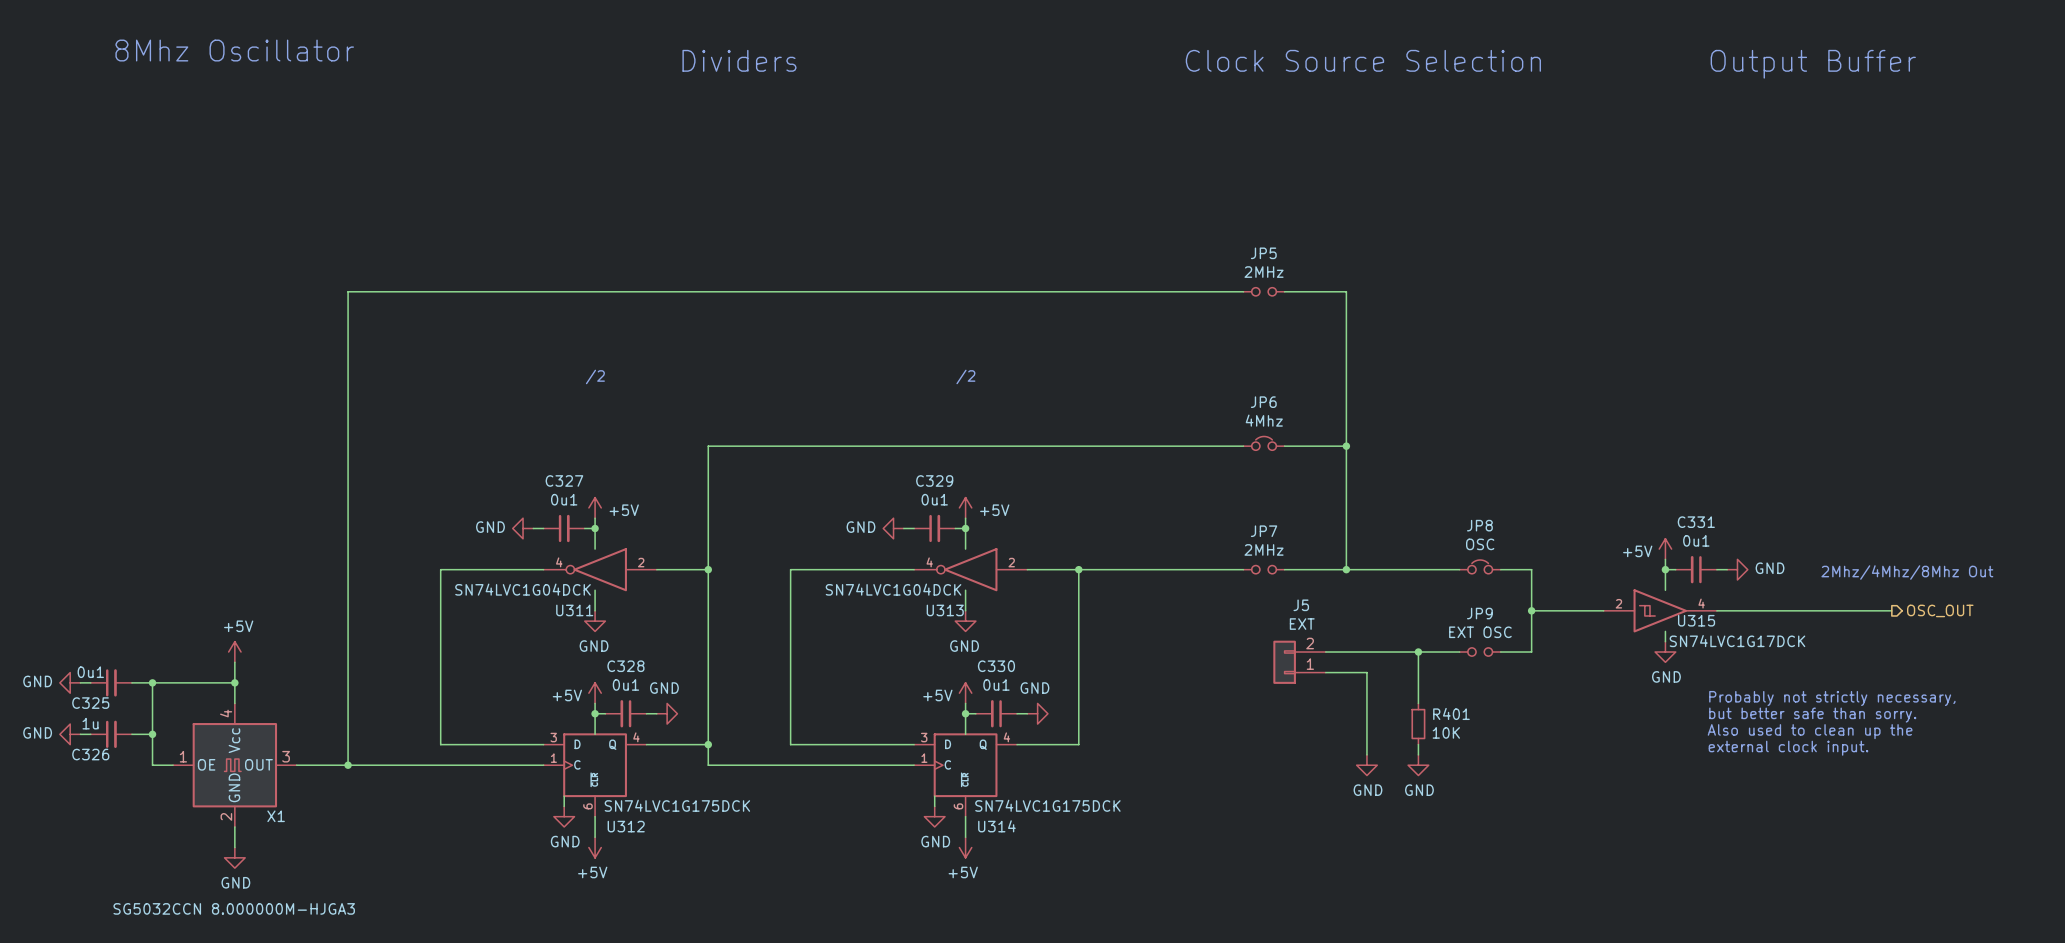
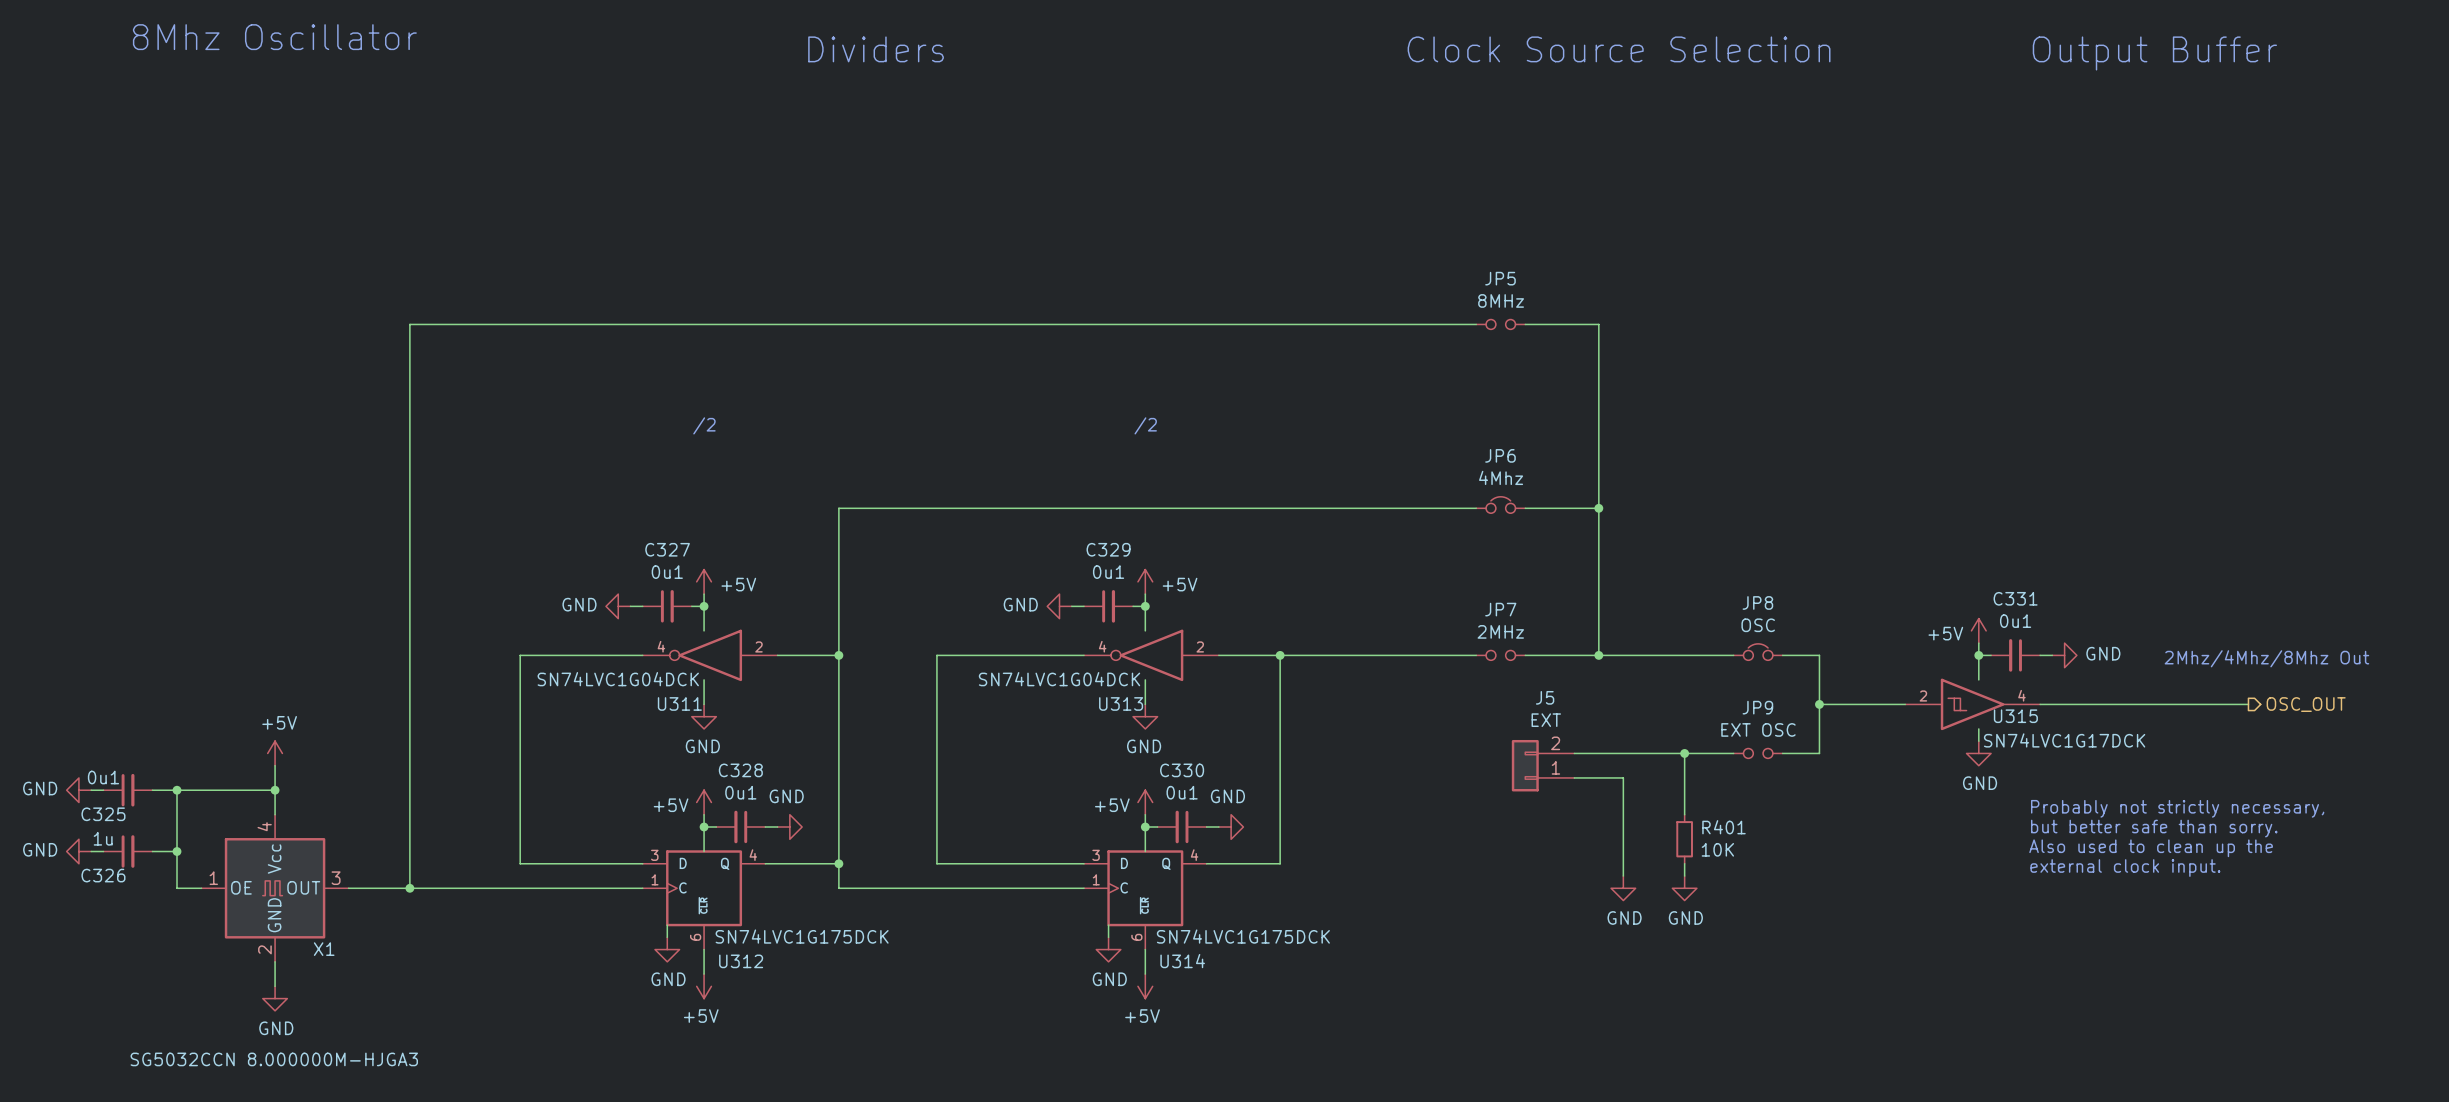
JP5 value: 2MHz (1264, 272) -> 8MHz (1501, 300)

